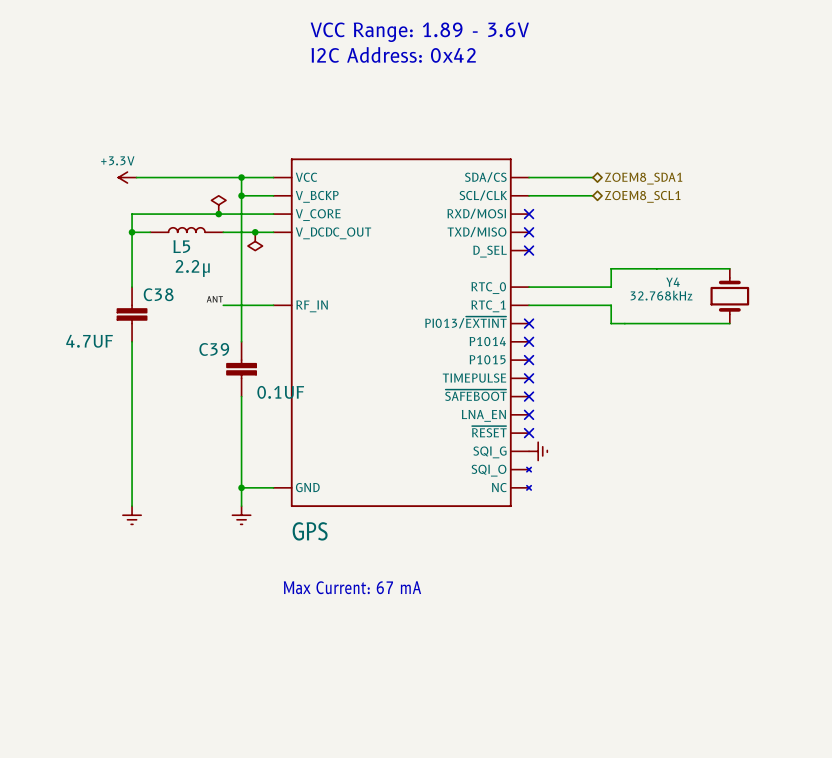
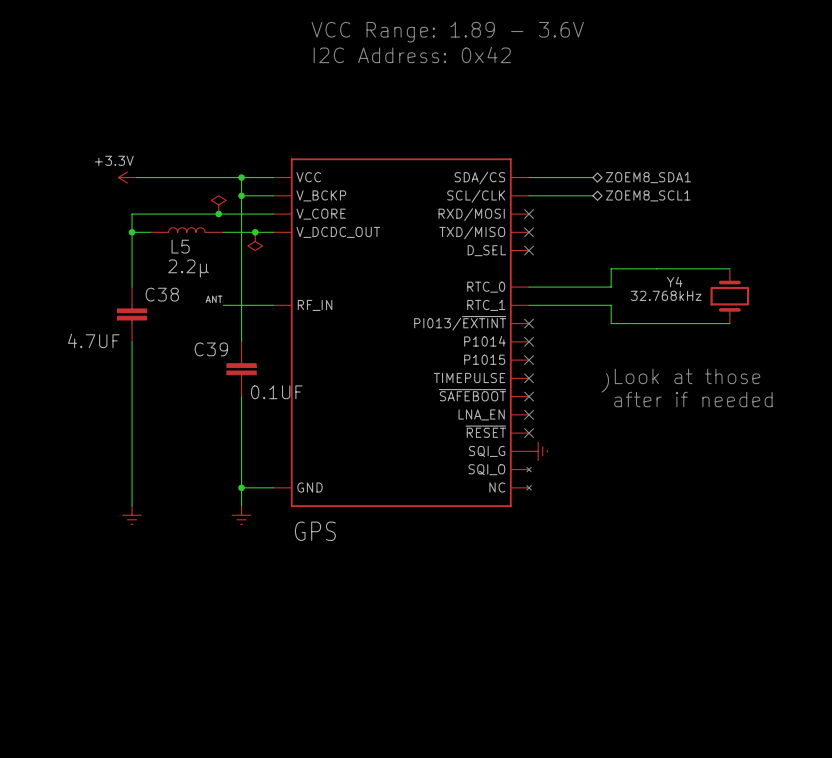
line: none -> (606, 373) (608, 383) (602, 392)
text: none -> Look at those (687, 376)
text: none -> after if needed (693, 399)
text: Max Current: 67 mA (352, 587) -> none

